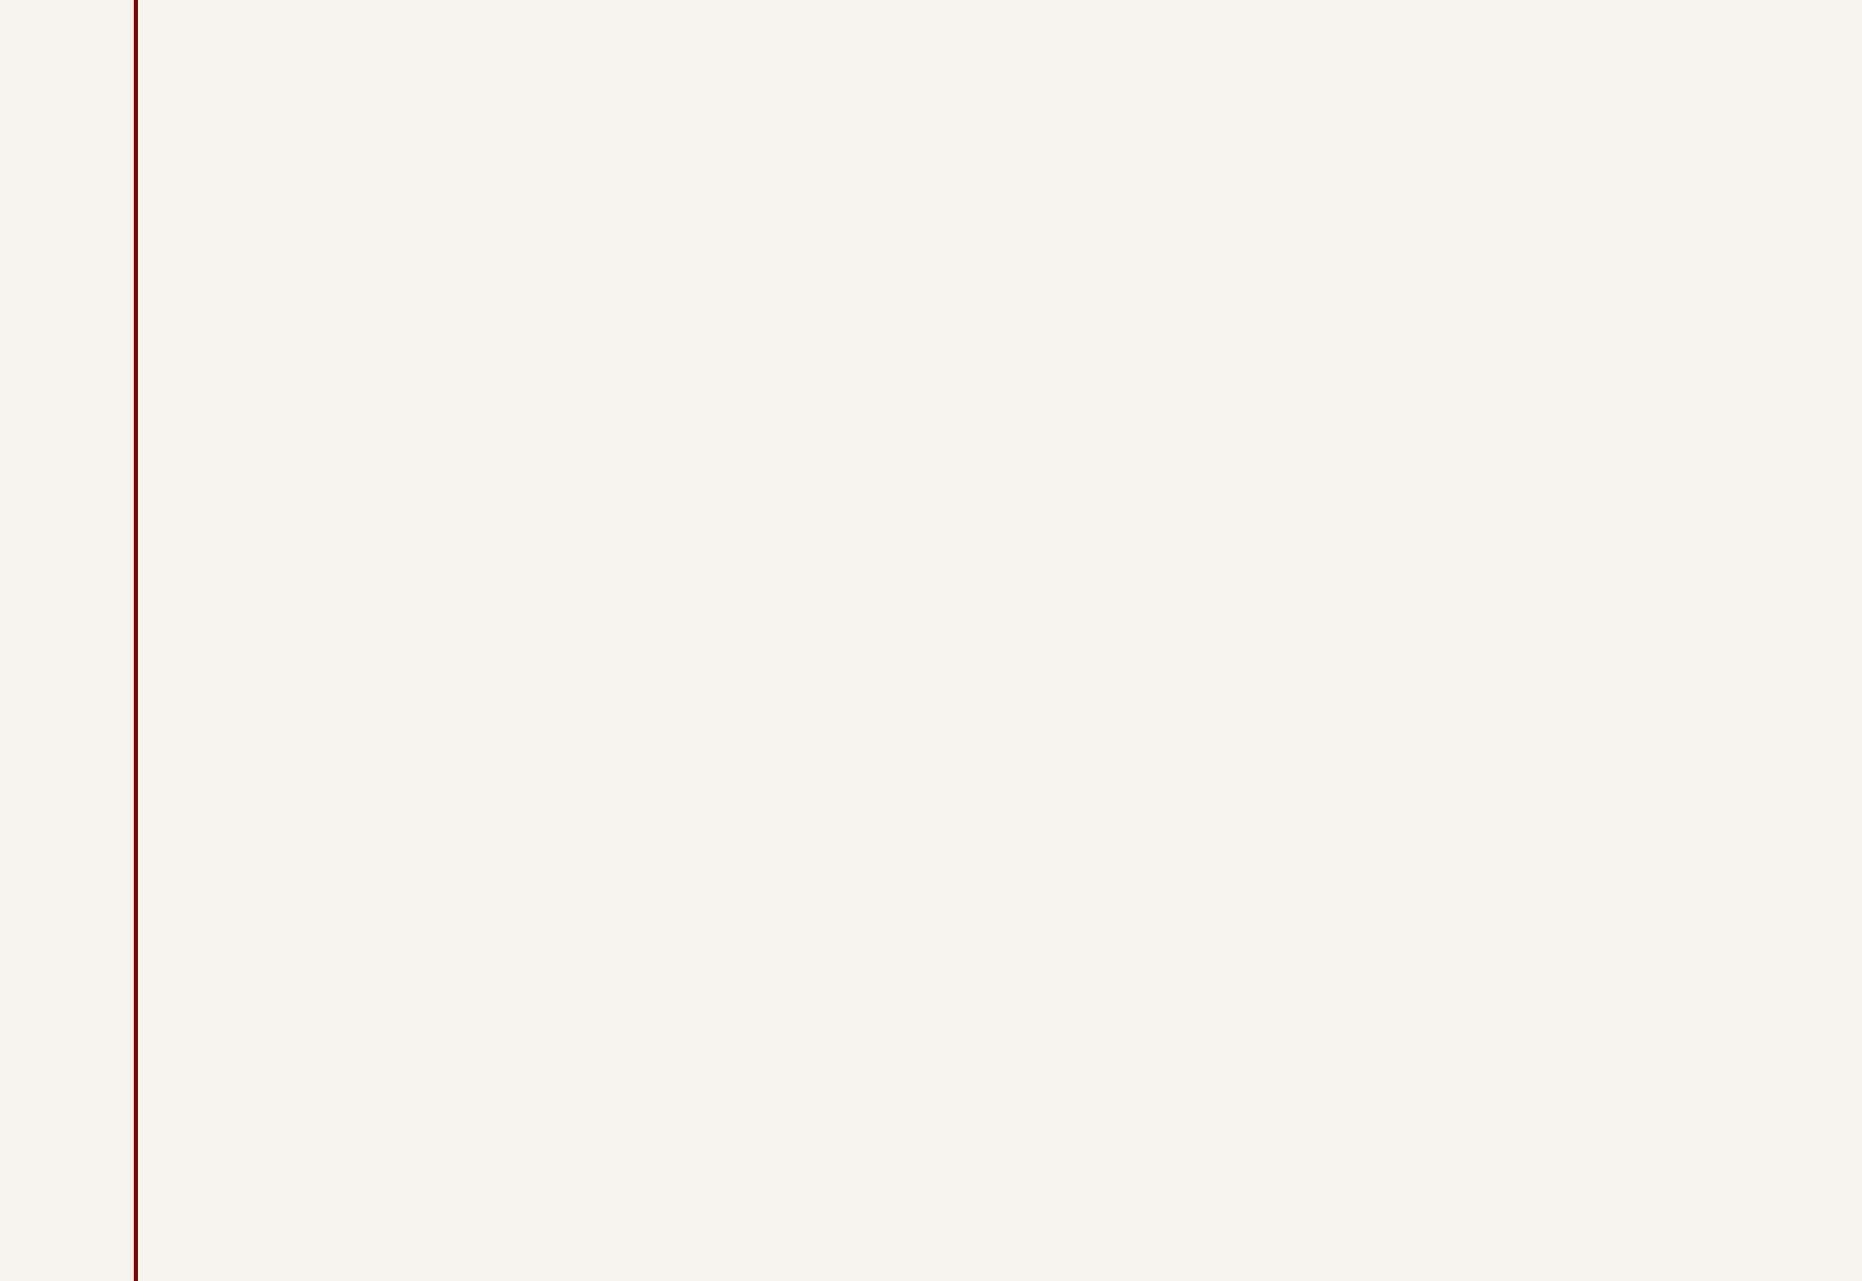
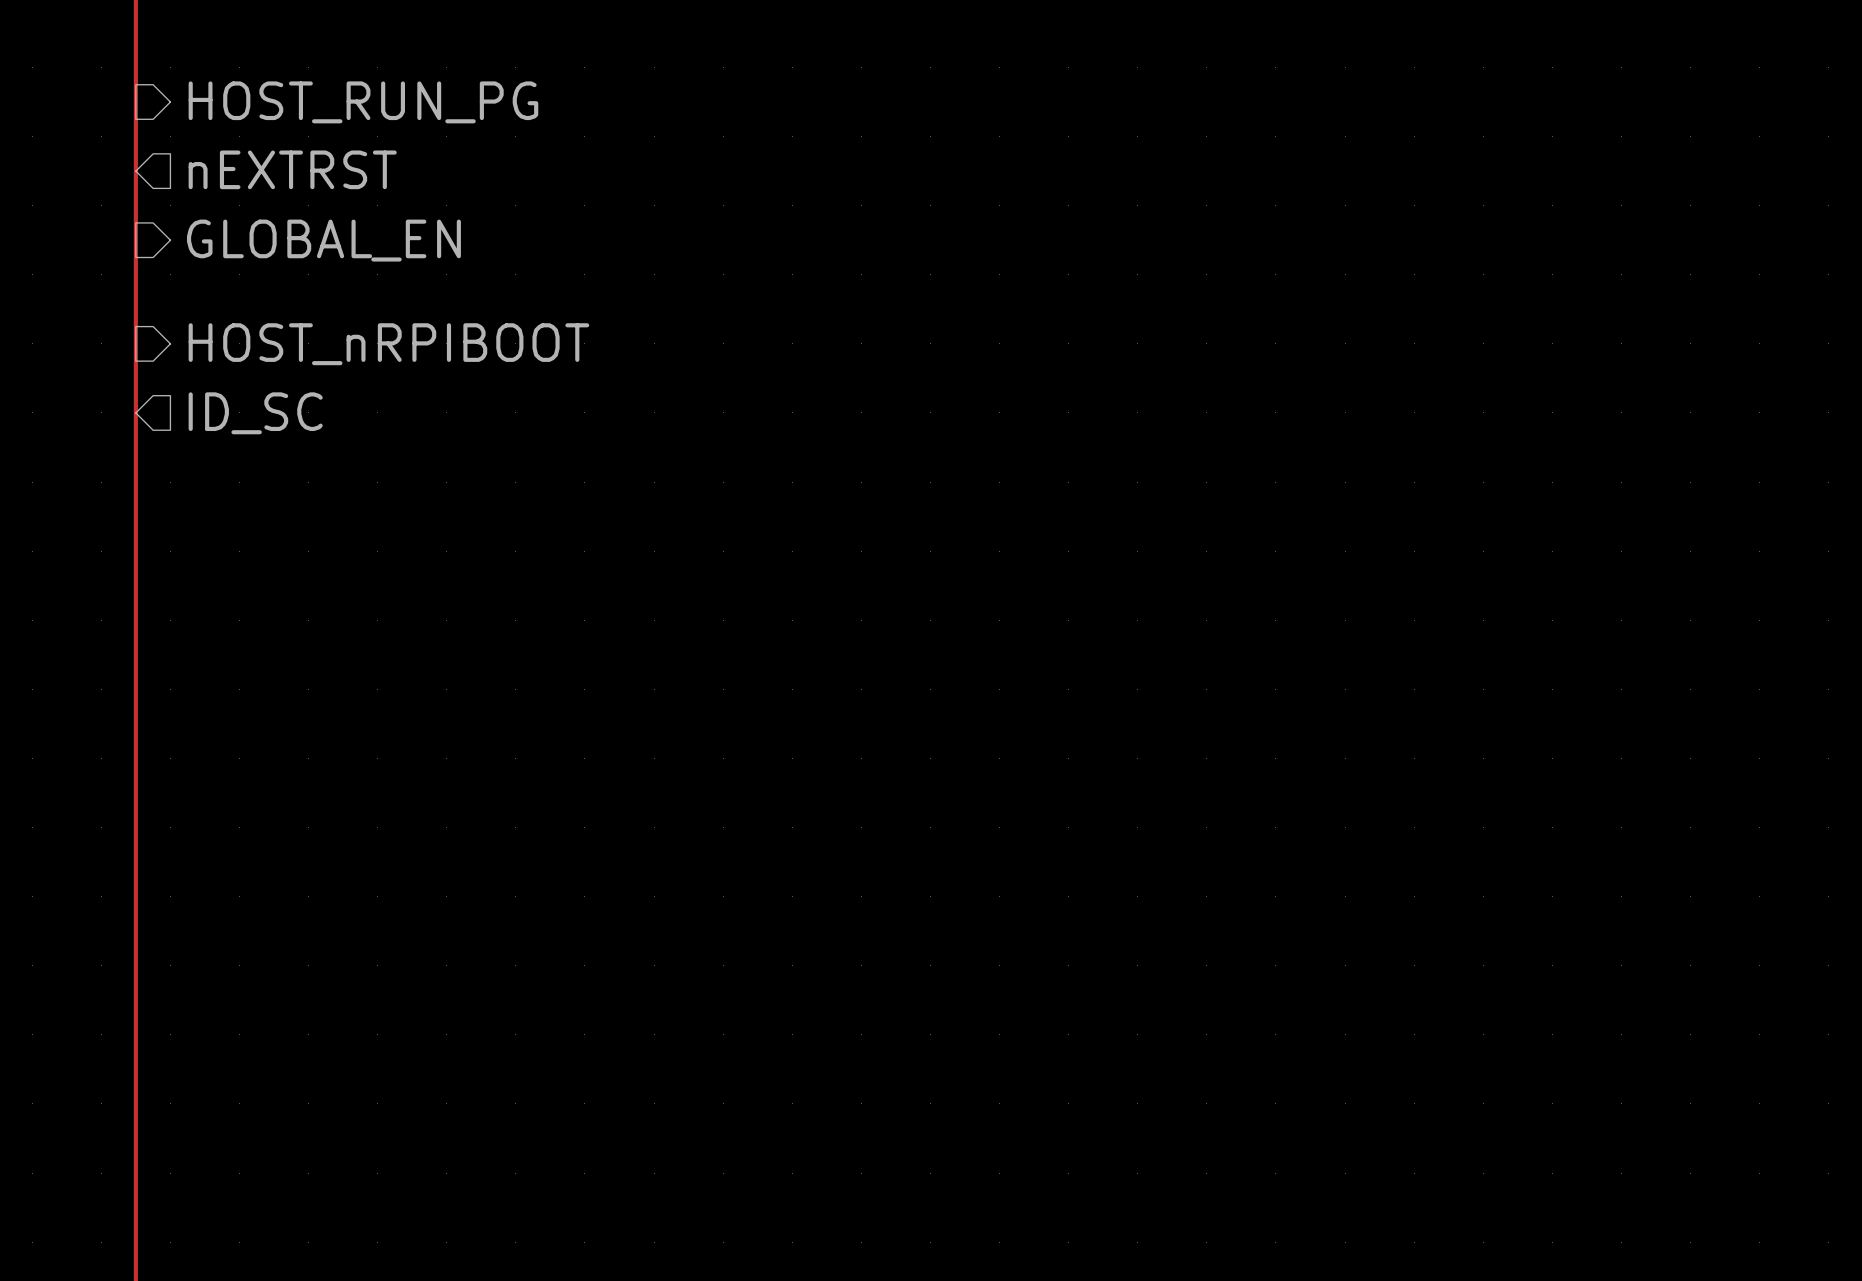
sheet pin: none -> HOST_RUN_PG (363, 102)
sheet pin: none -> nEXTRST (292, 169)
sheet pin: none -> GLOBAL_EN (323, 240)
sheet pin: none -> HOST_nRPIBOOT (388, 344)
sheet pin: none -> ID_SC (255, 413)

